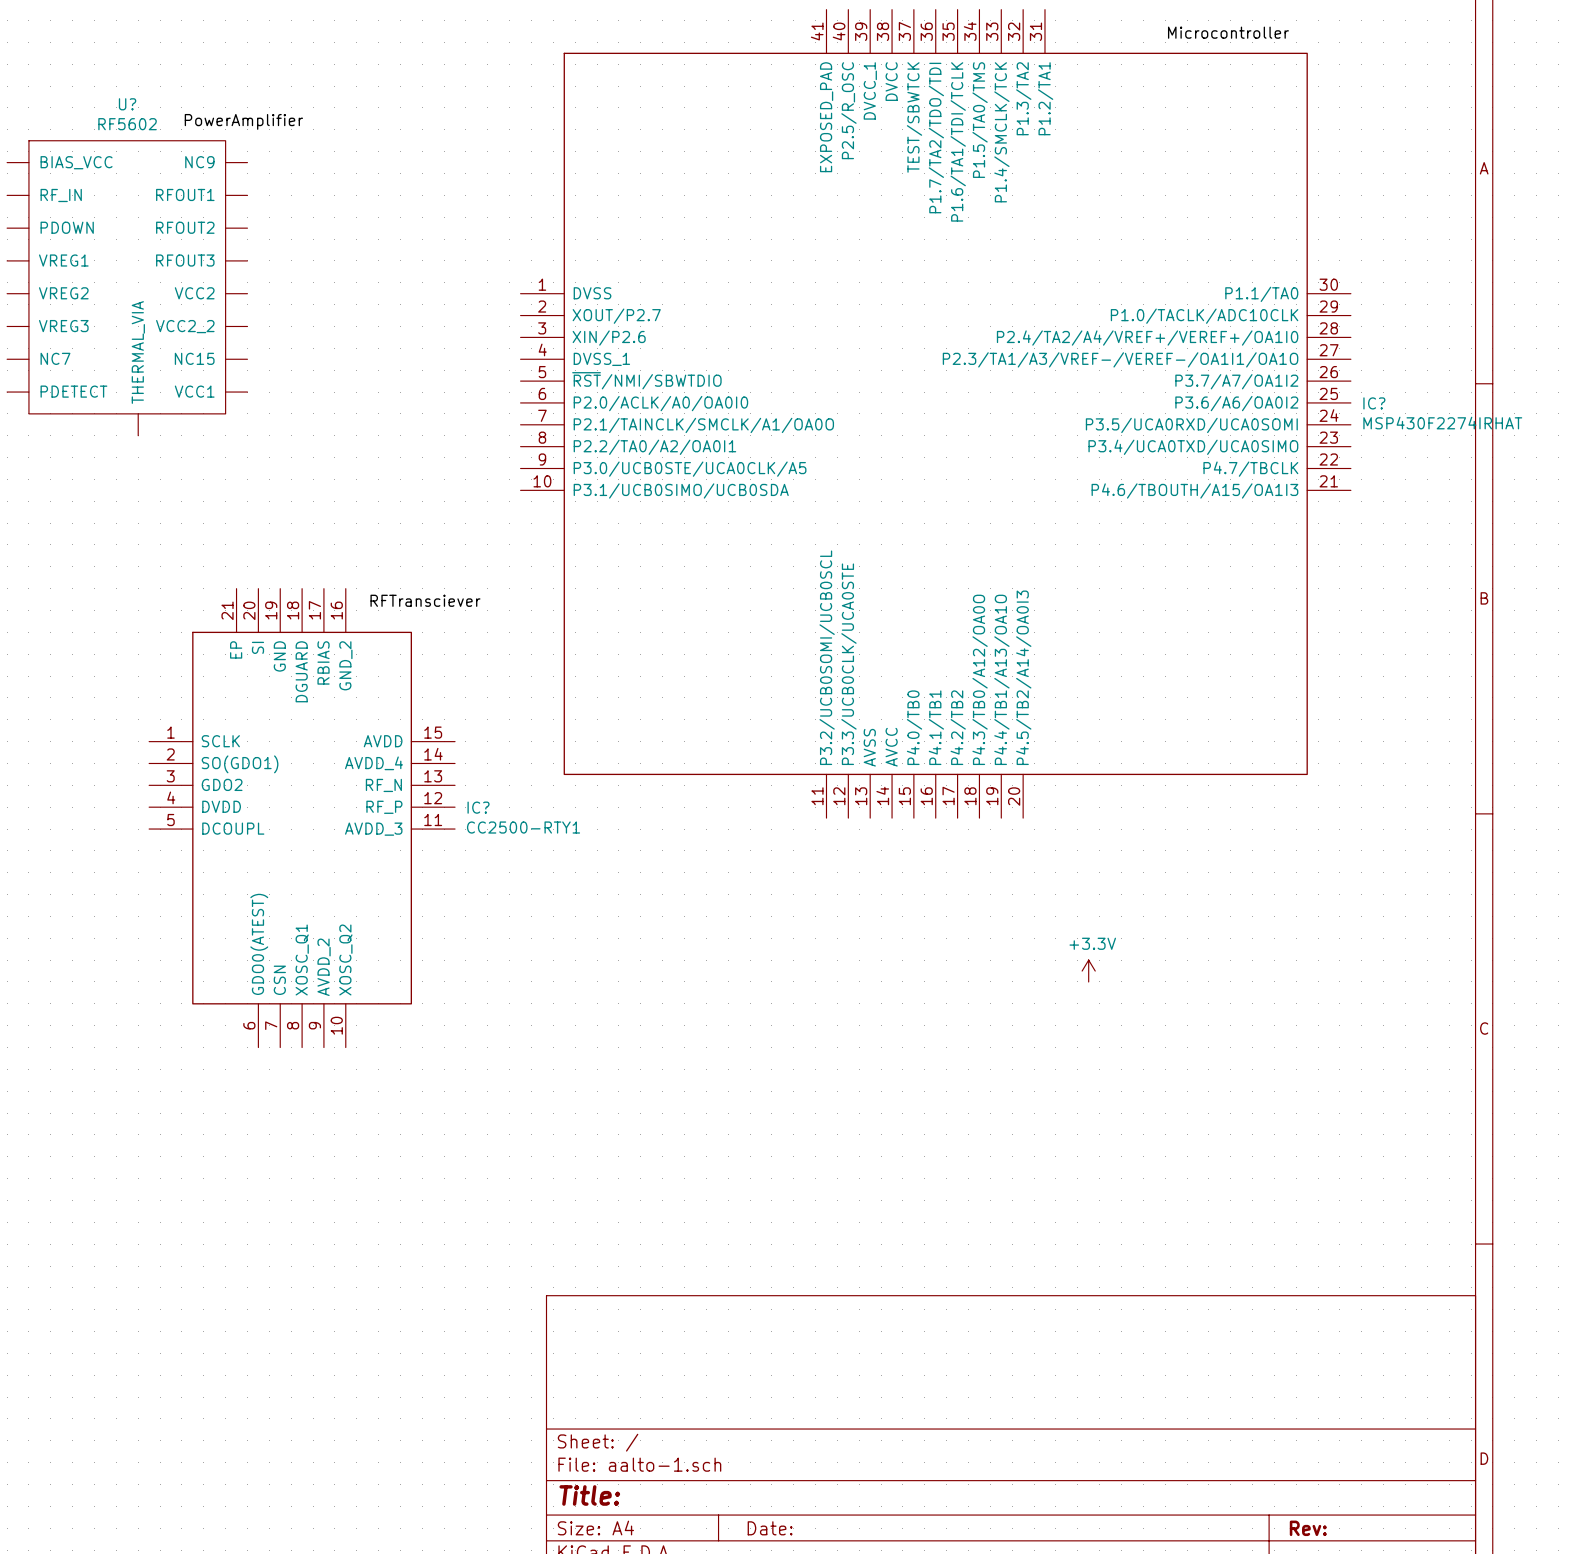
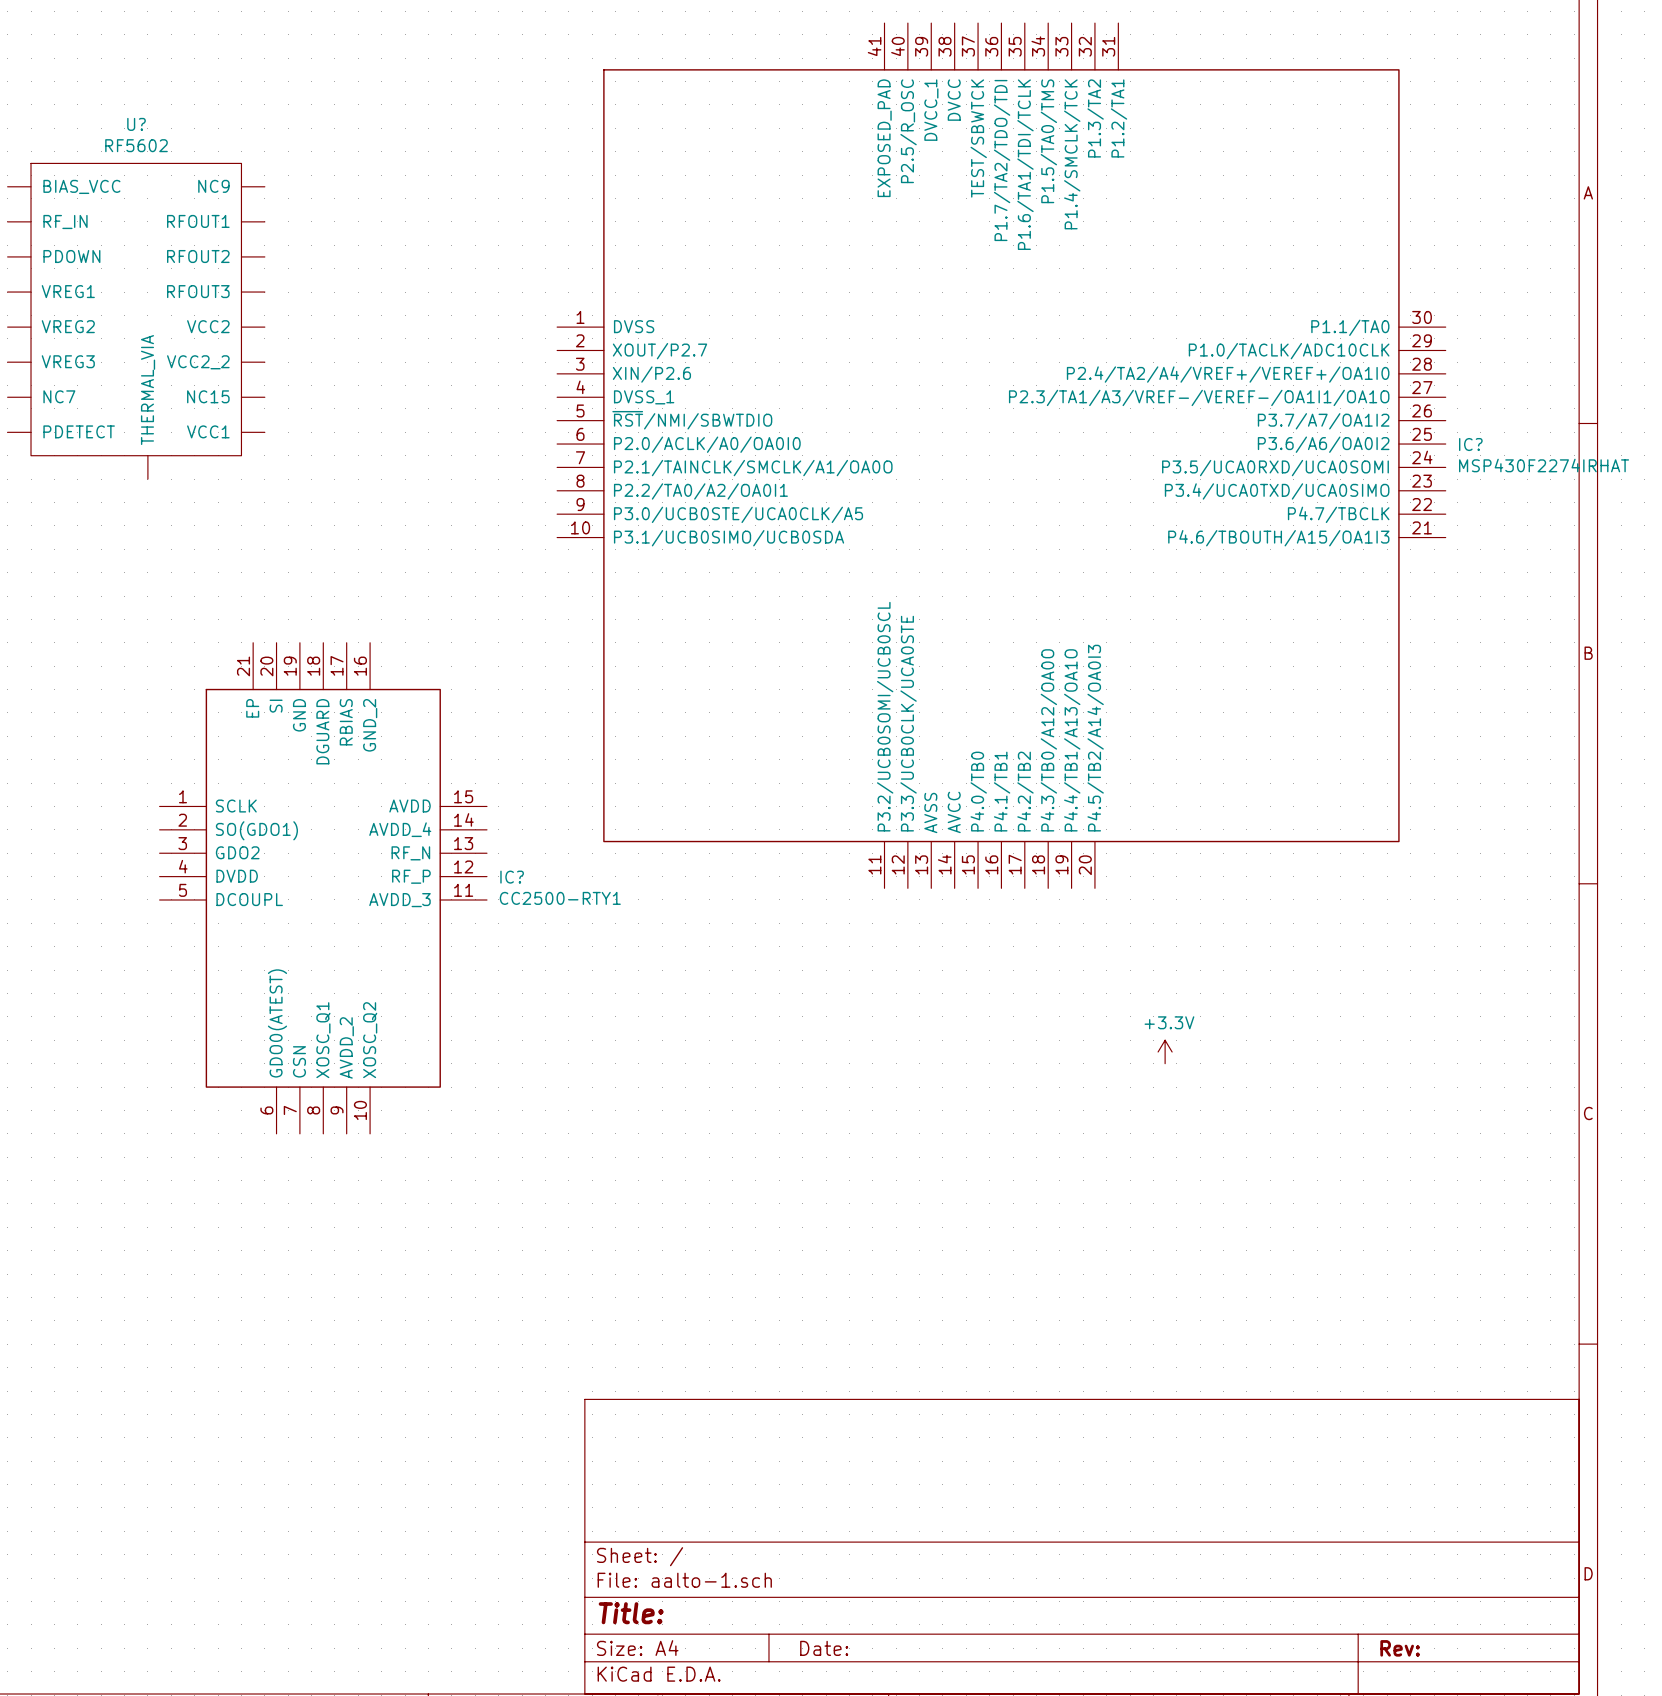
label: Microcontroller (1228, 32) -> none
label: PowerAmplifier (243, 121) -> none
label: RFTransciever (425, 600) -> none

